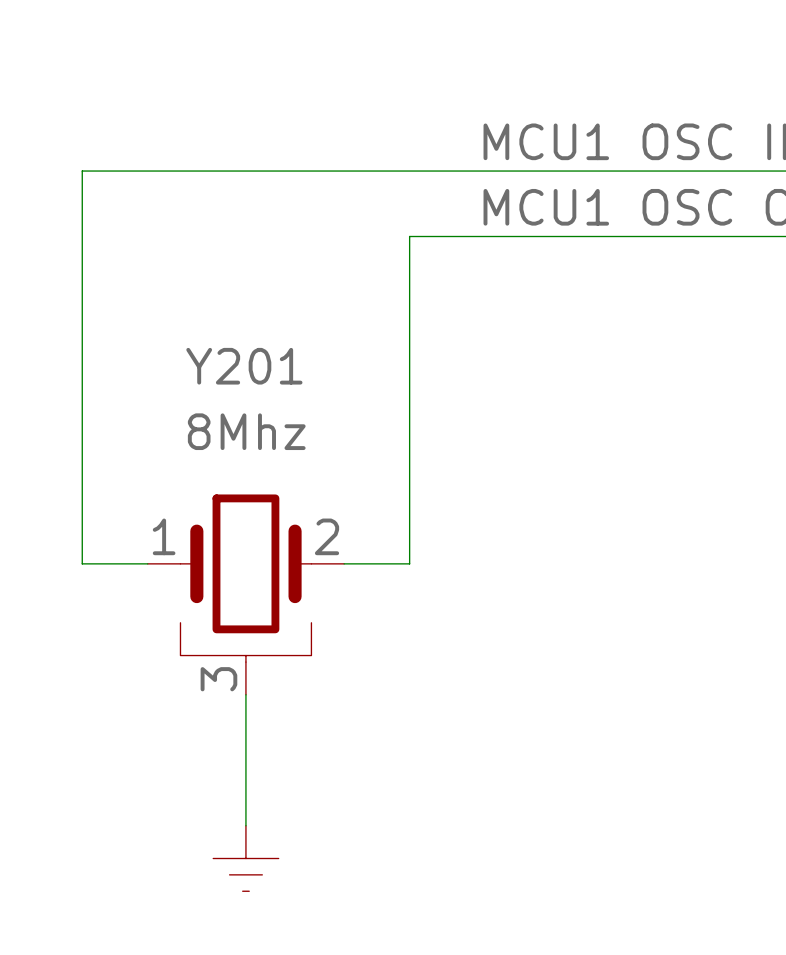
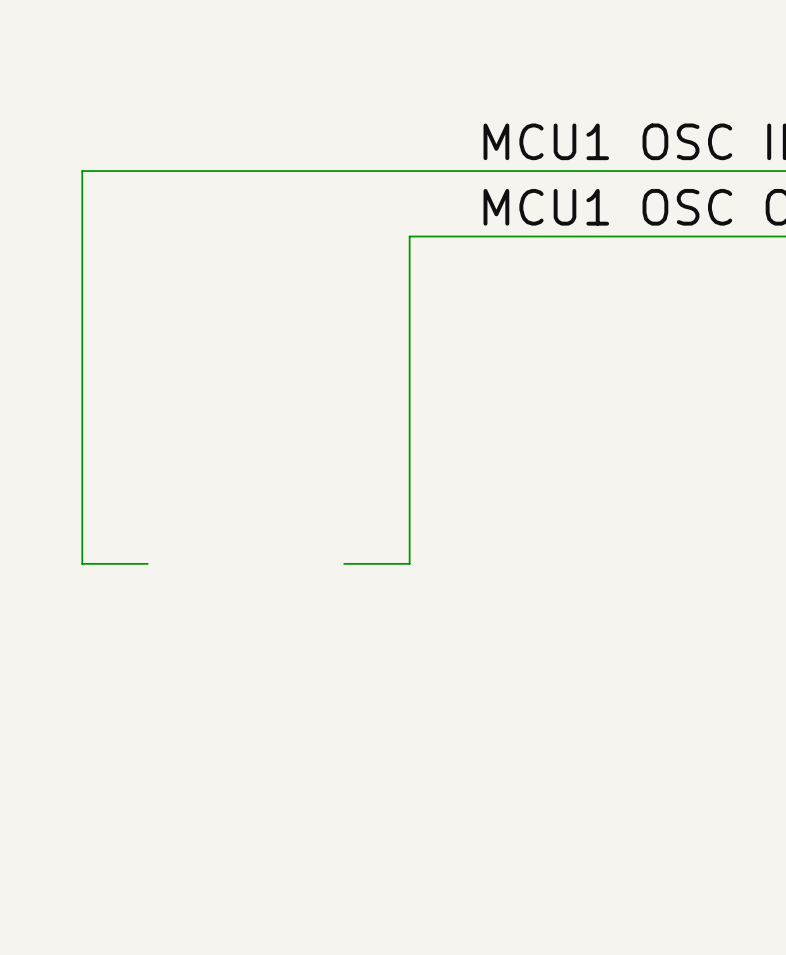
Y201: 8Mhz (245, 594) -> none
wire: (245, 694) (245, 825) -> none
power symbol: (245, 858) -> none

